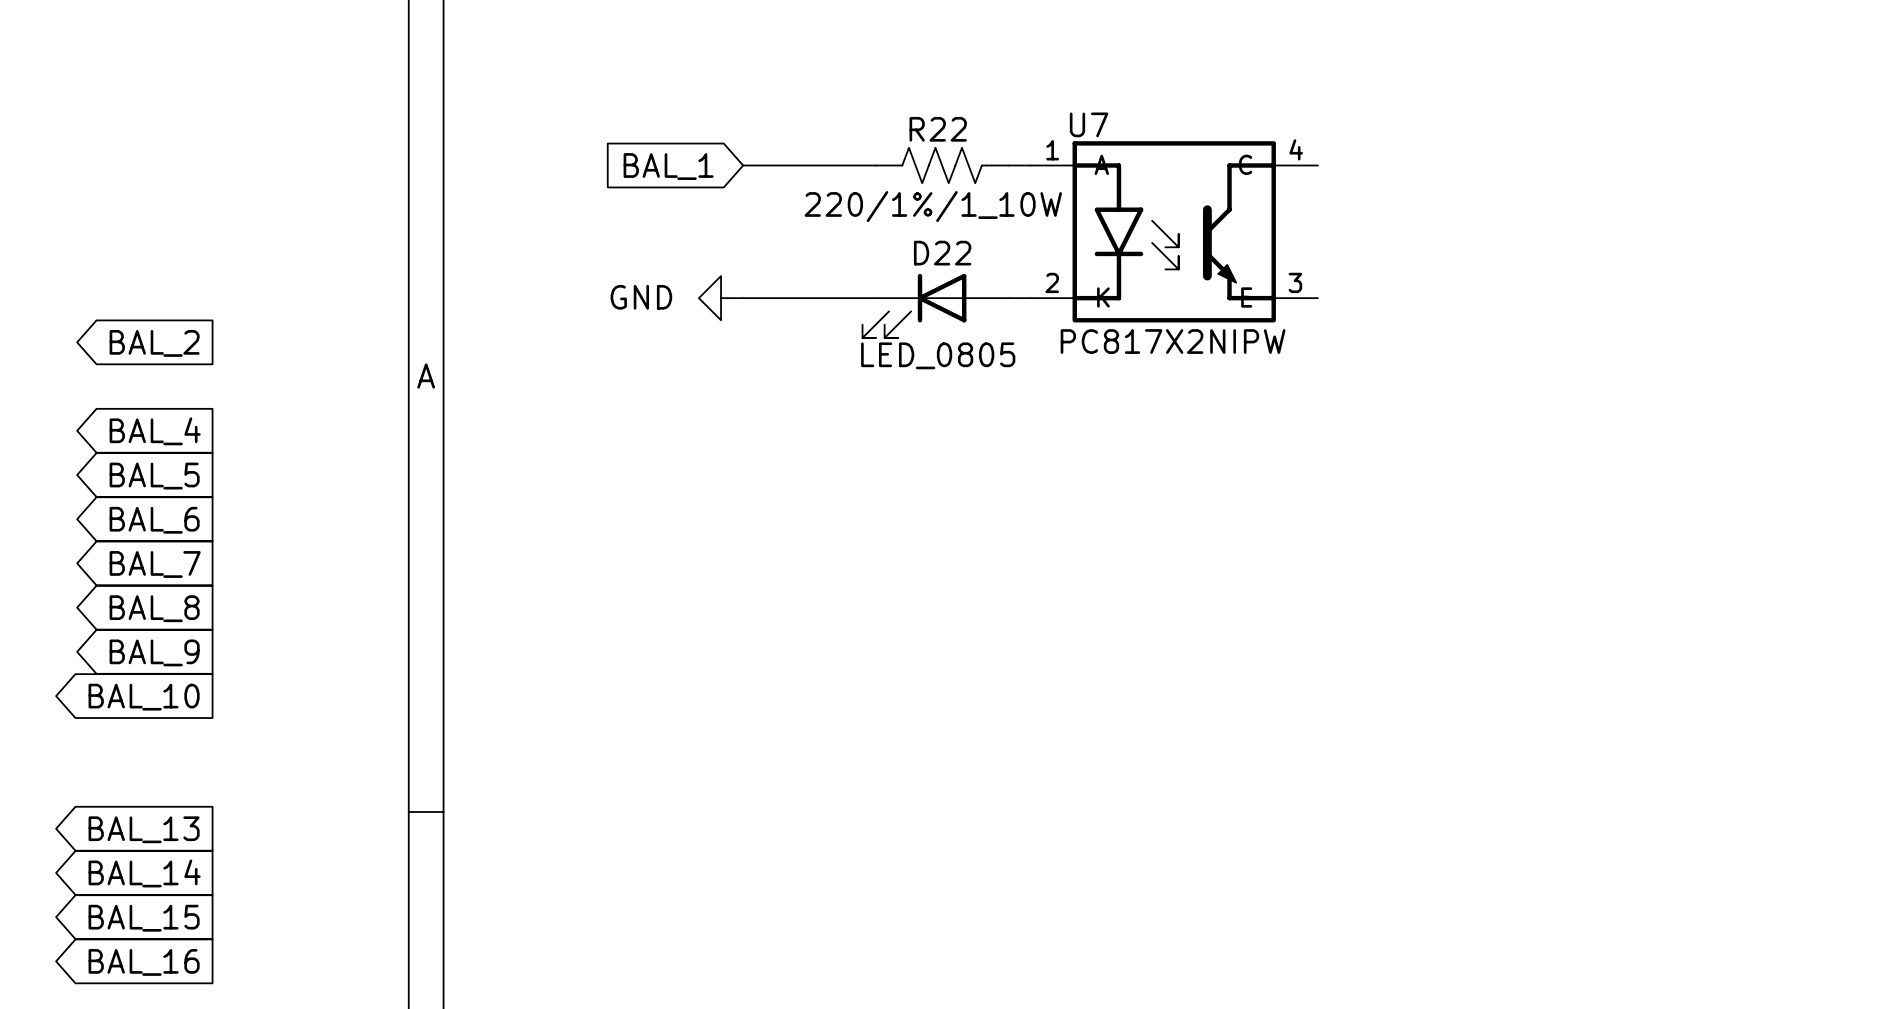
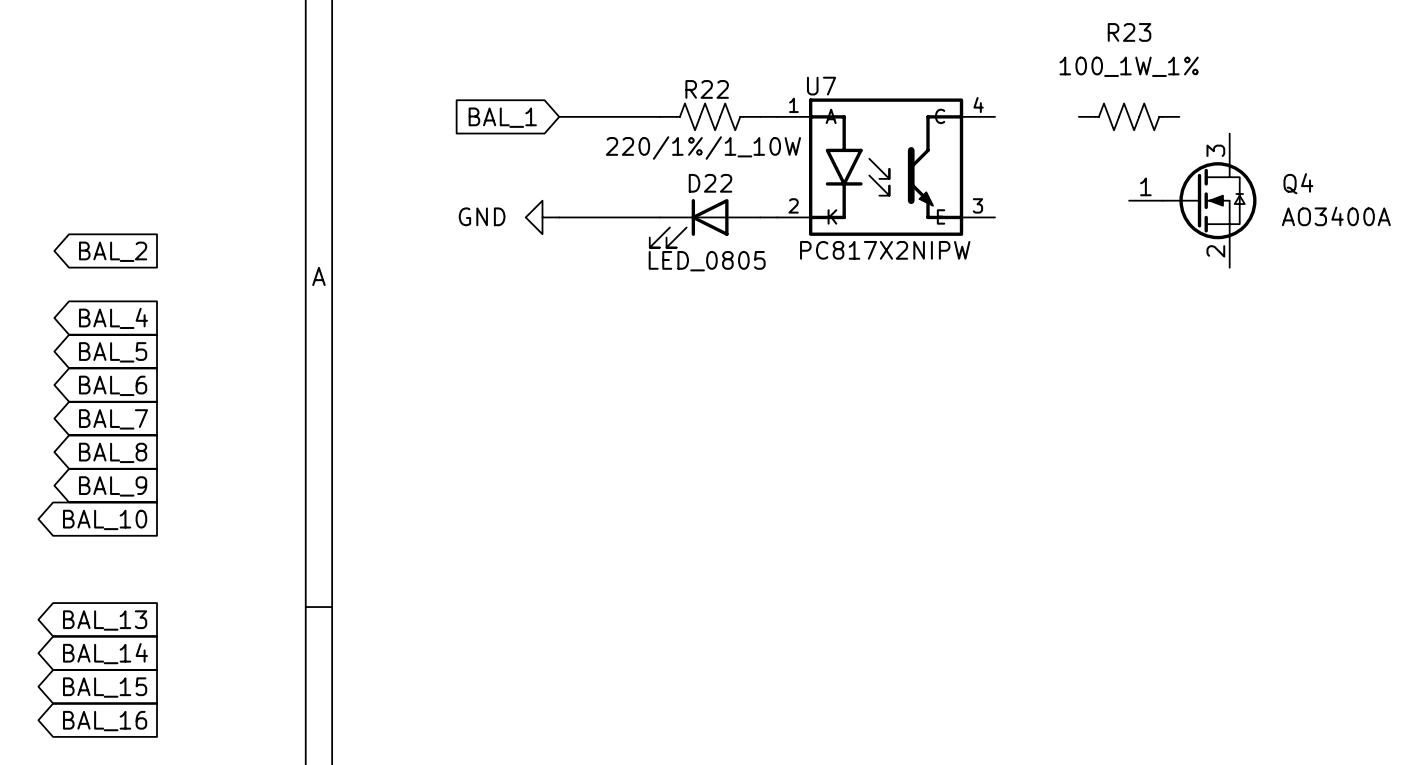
R23: none -> 100_1W_1% (1129, 116)
Q4: none -> AO3400A (1192, 200)

